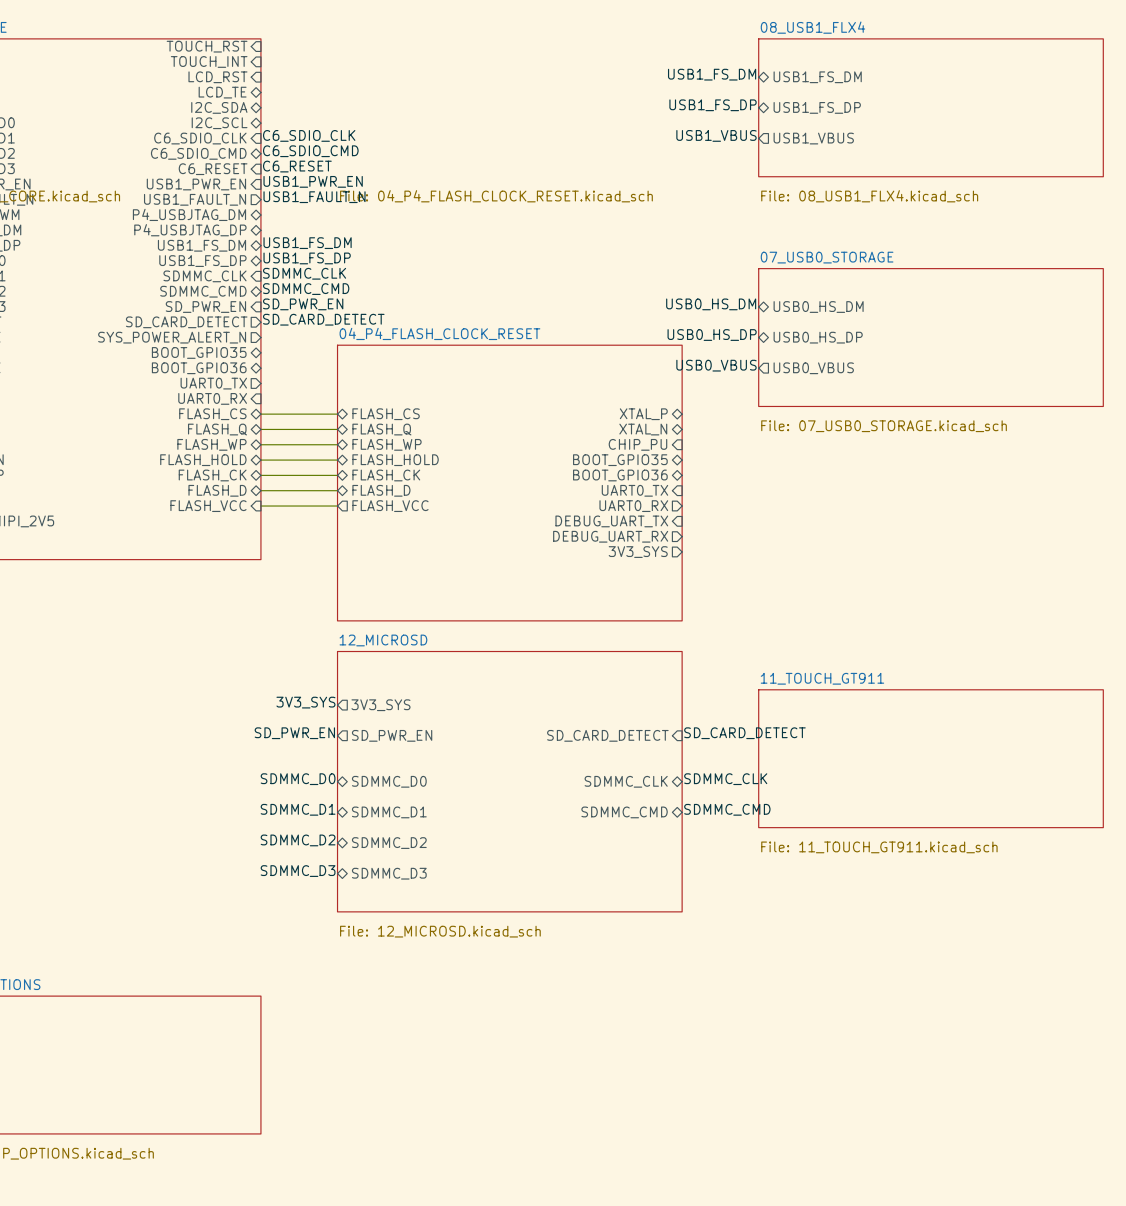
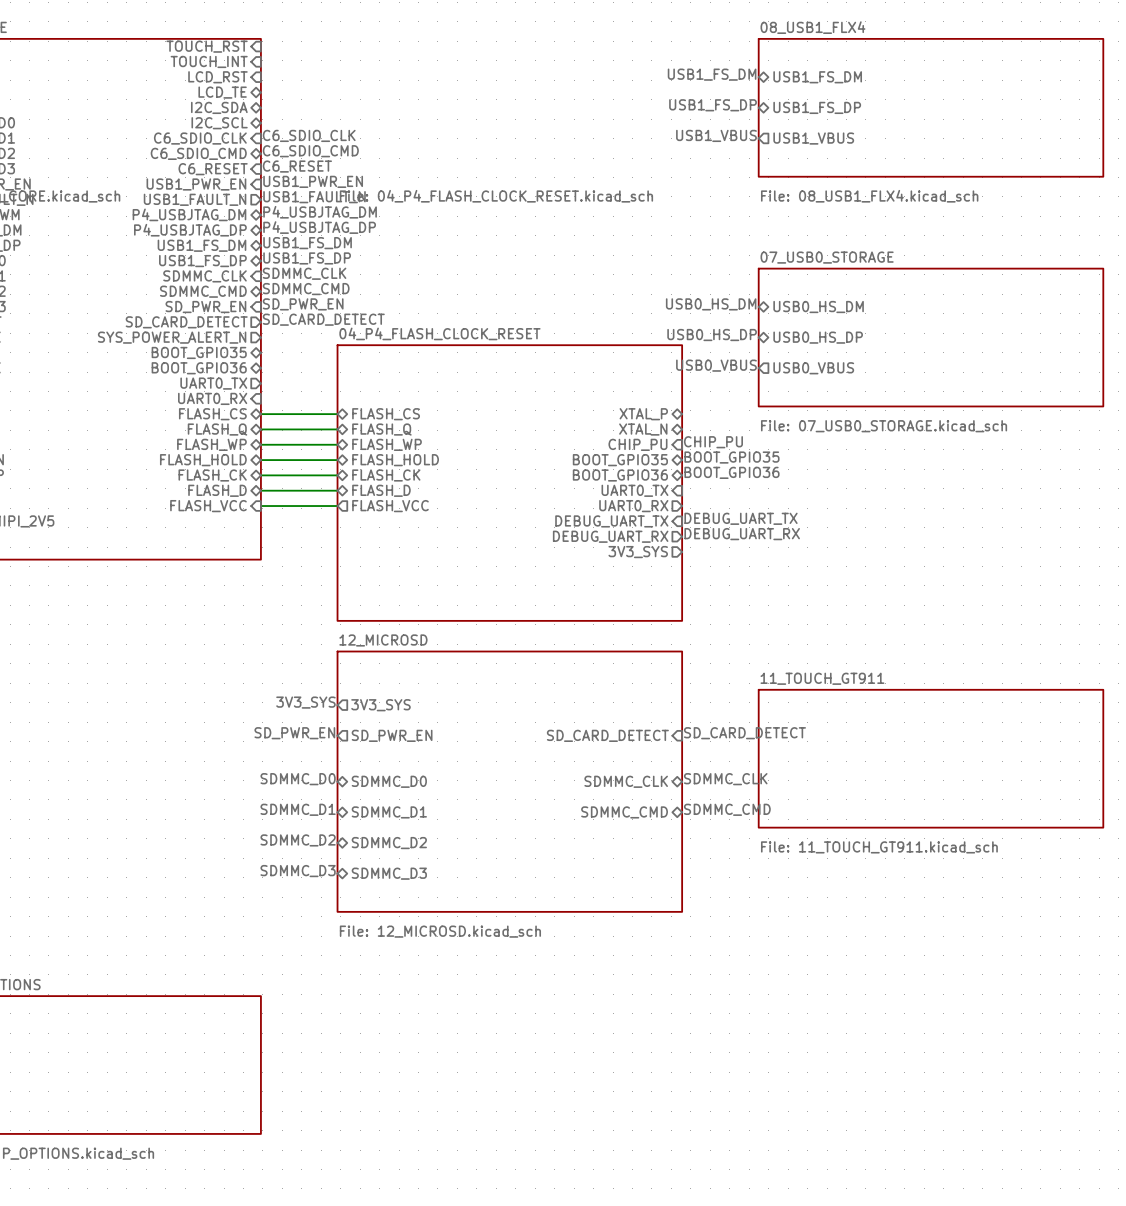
label: none -> P4_USBJTAG_DM (320, 212)
label: none -> P4_USBJTAG_DP (319, 227)
label: none -> CHIP_PU (713, 442)
label: none -> BOOT_GPIO35 (731, 457)
label: none -> BOOT_GPIO36 (731, 472)
label: none -> DEBUG_UART_TX (741, 518)
label: none -> DEBUG_UART_RX (742, 534)

